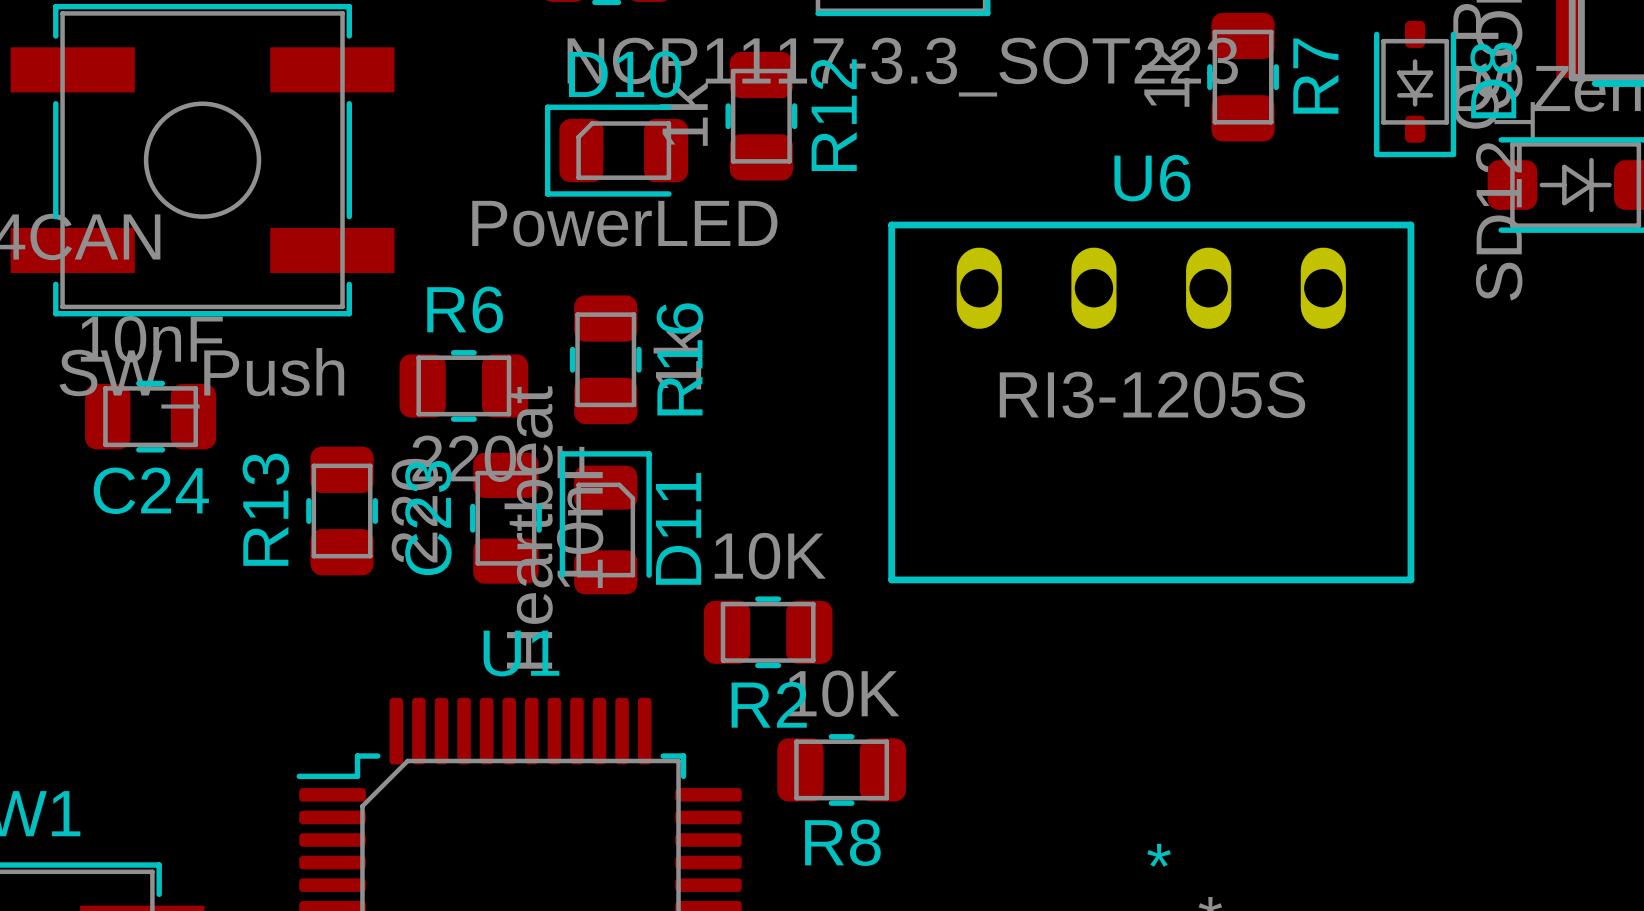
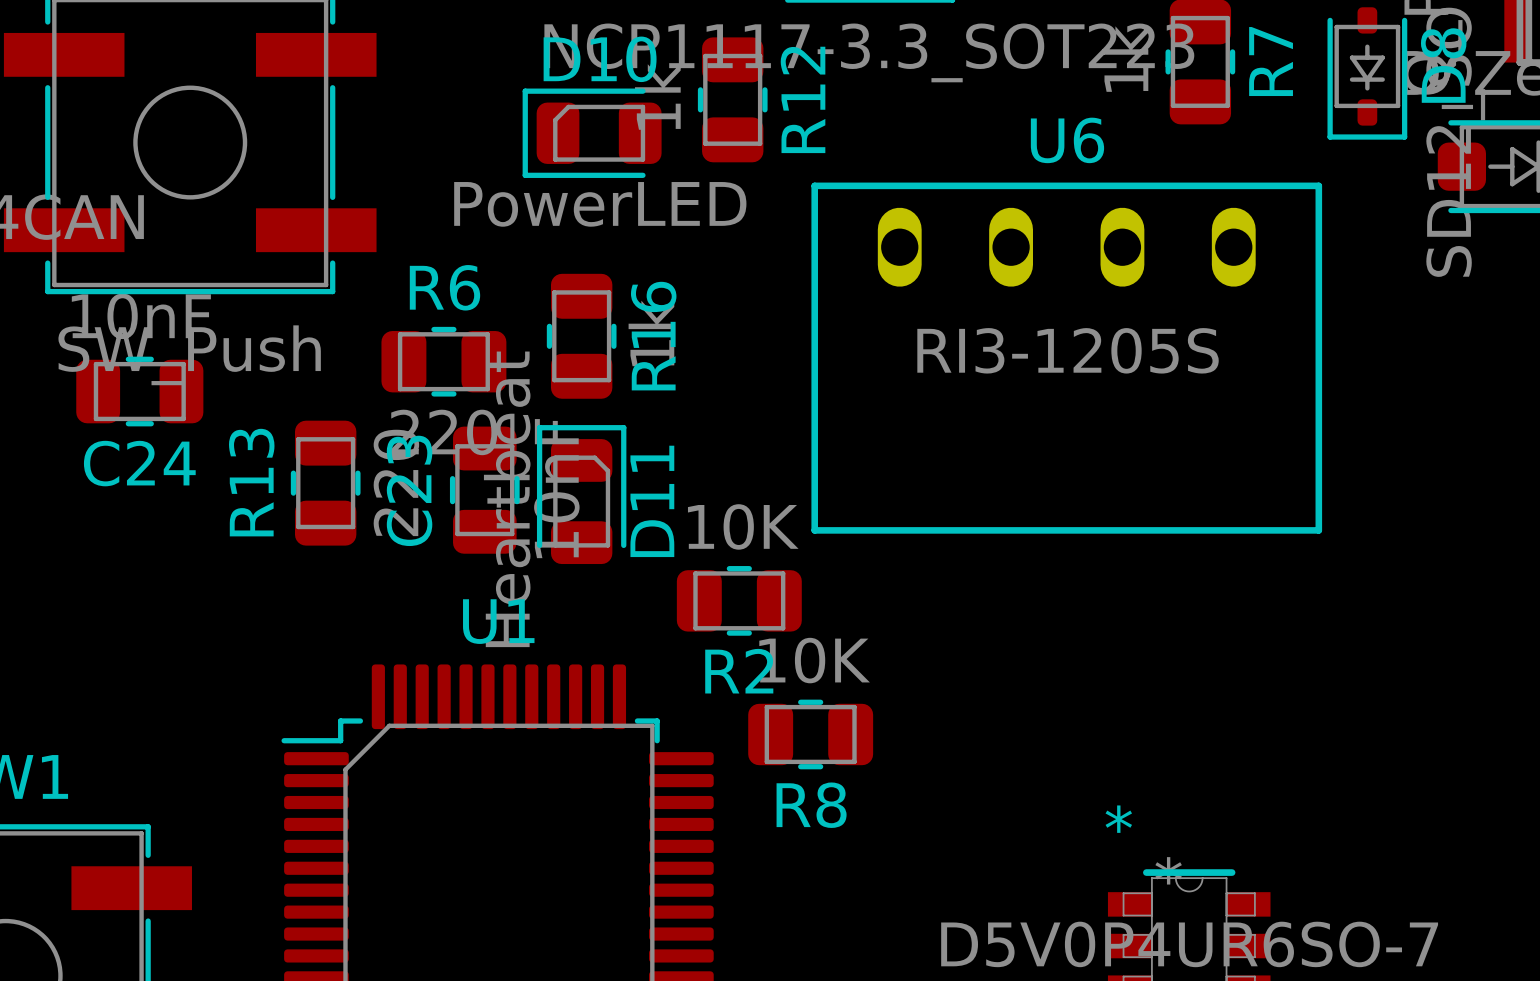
U6 position: (1151, 402) -> (1066, 358)

